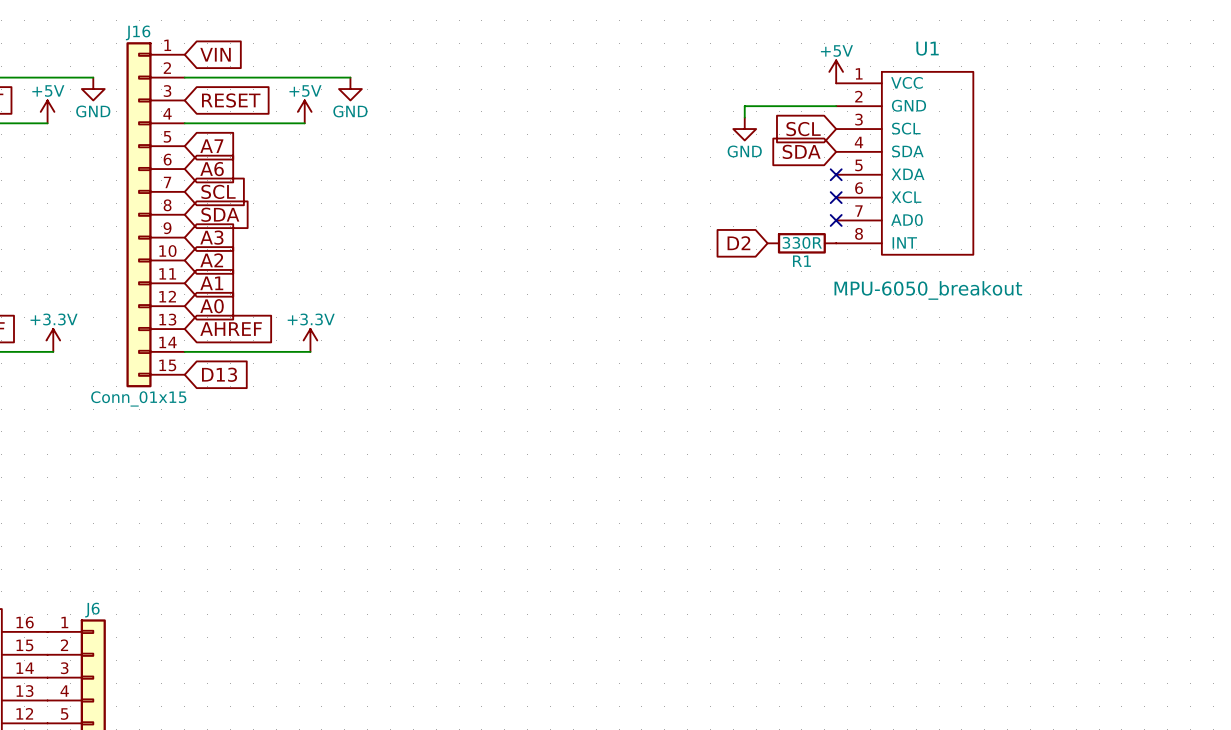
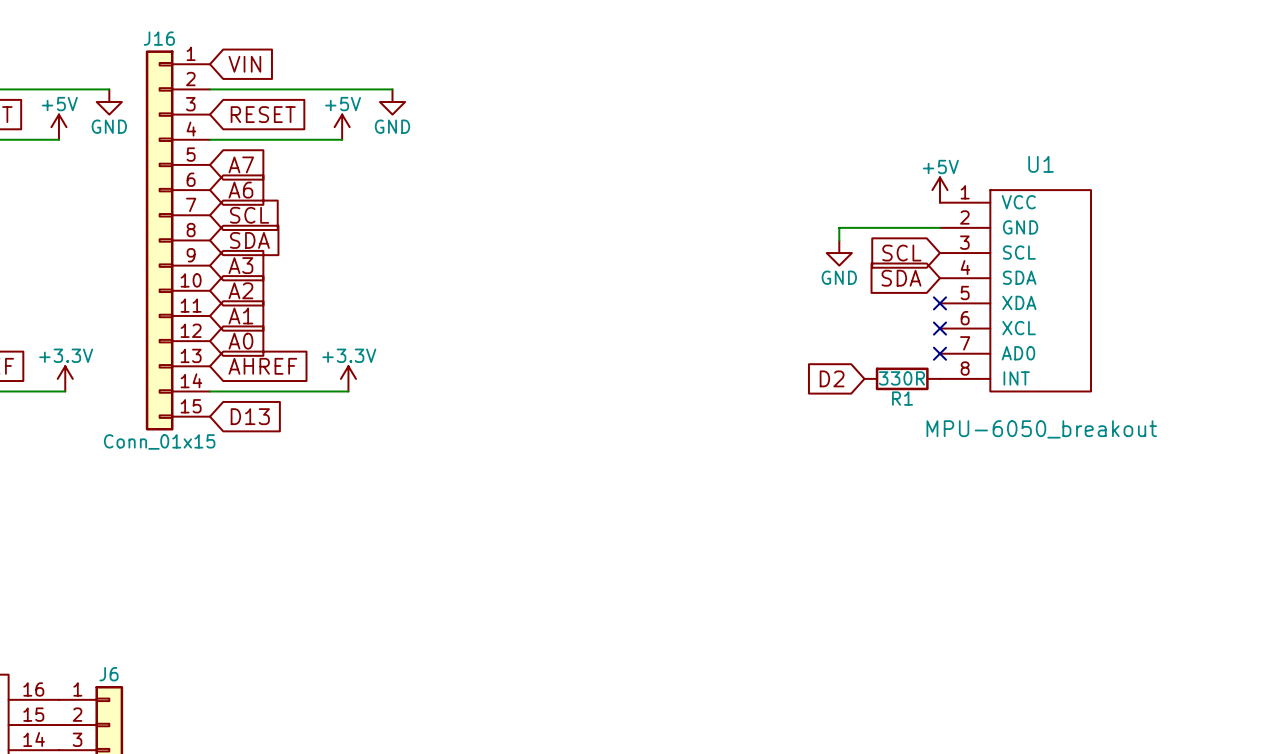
power symbol position: +5V (836, 71) -> +5V (939, 190)
wire: (836, 106) (744, 106) (744, 117) -> (939, 227) (839, 227) (839, 240)
power symbol position: GND (744, 129) -> GND (839, 253)
global label position: SCL (803, 129) -> SCL (901, 253)
global label position: SDA (801, 151) -> SDA (901, 278)
U1 position: (904, 163) -> (1015, 290)
no-connect mark: (836, 174) -> none
no-connect mark: (836, 197) -> none
no-connect mark: (836, 220) -> none
global label position: D2 (738, 243) -> D2 (832, 378)
R1 position: (801, 243) -> (902, 378)
no-connect mark: none -> (939, 303)
no-connect mark: none -> (939, 328)
no-connect mark: none -> (939, 353)

